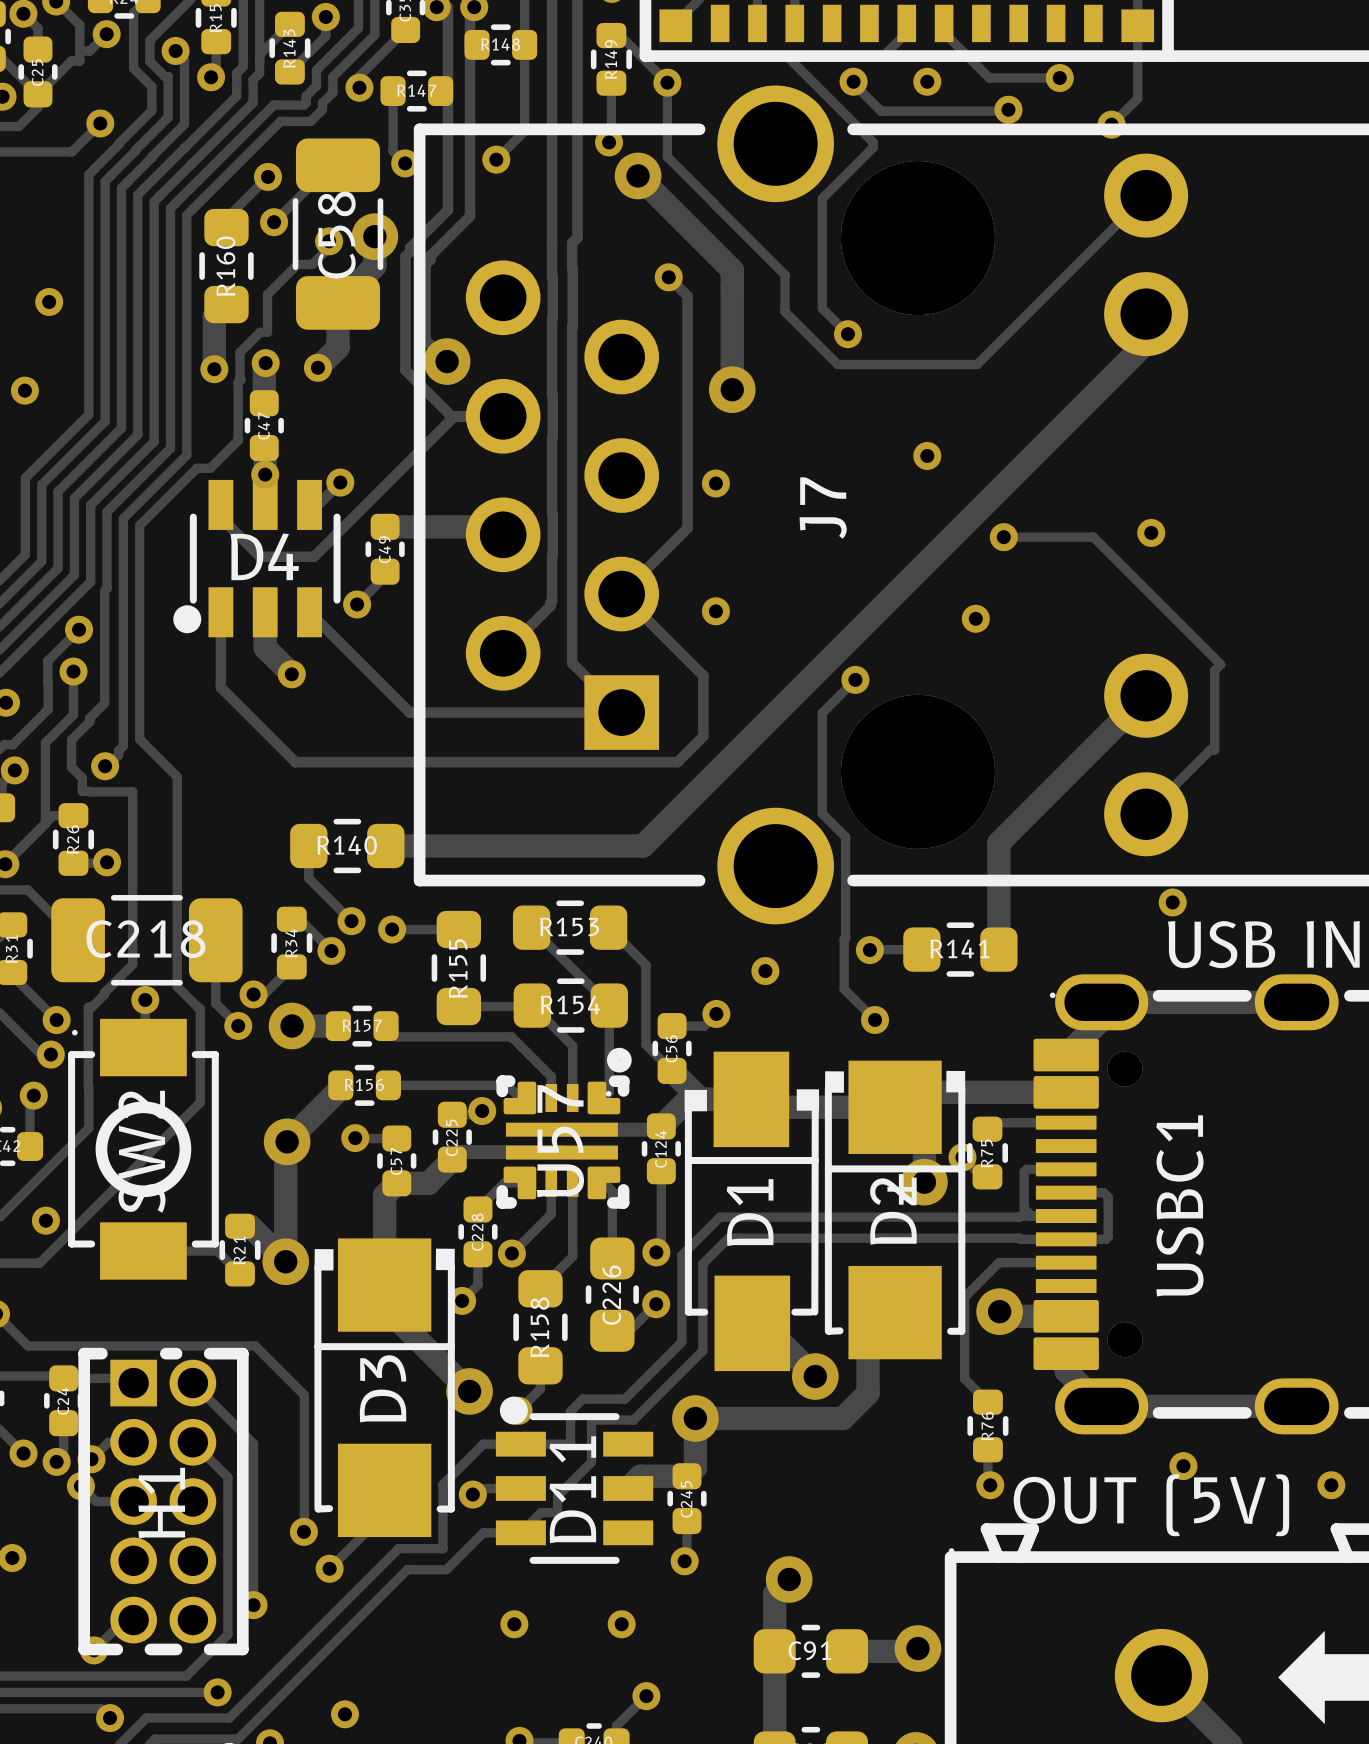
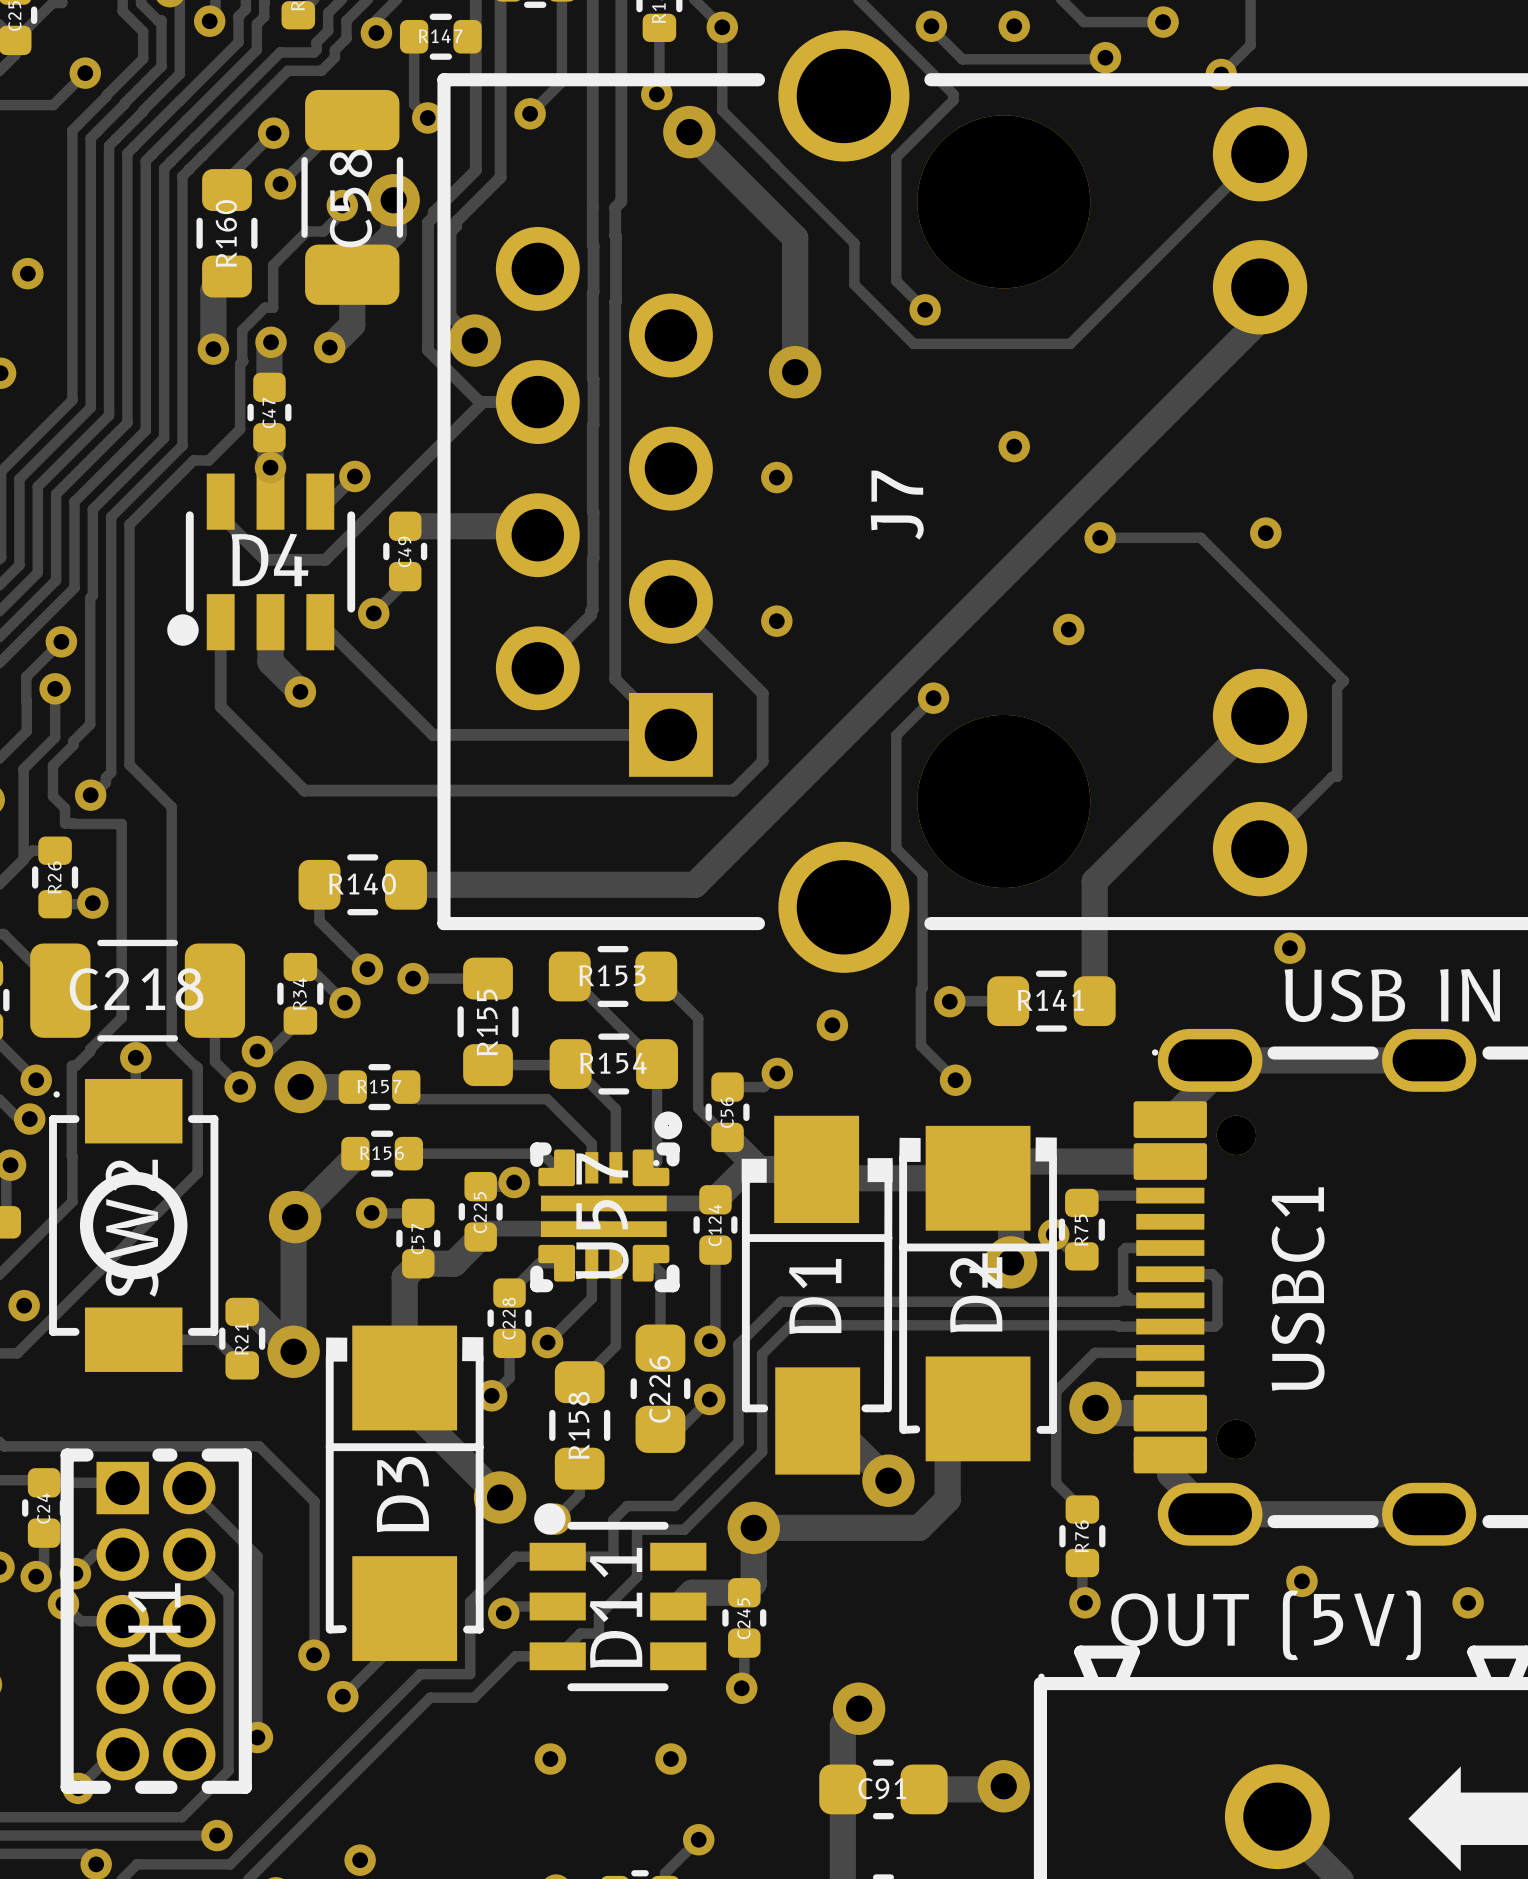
track: (668, 277) (687, 296) (687, 528) (621, 594) -> none
via: (668, 277) -> none

